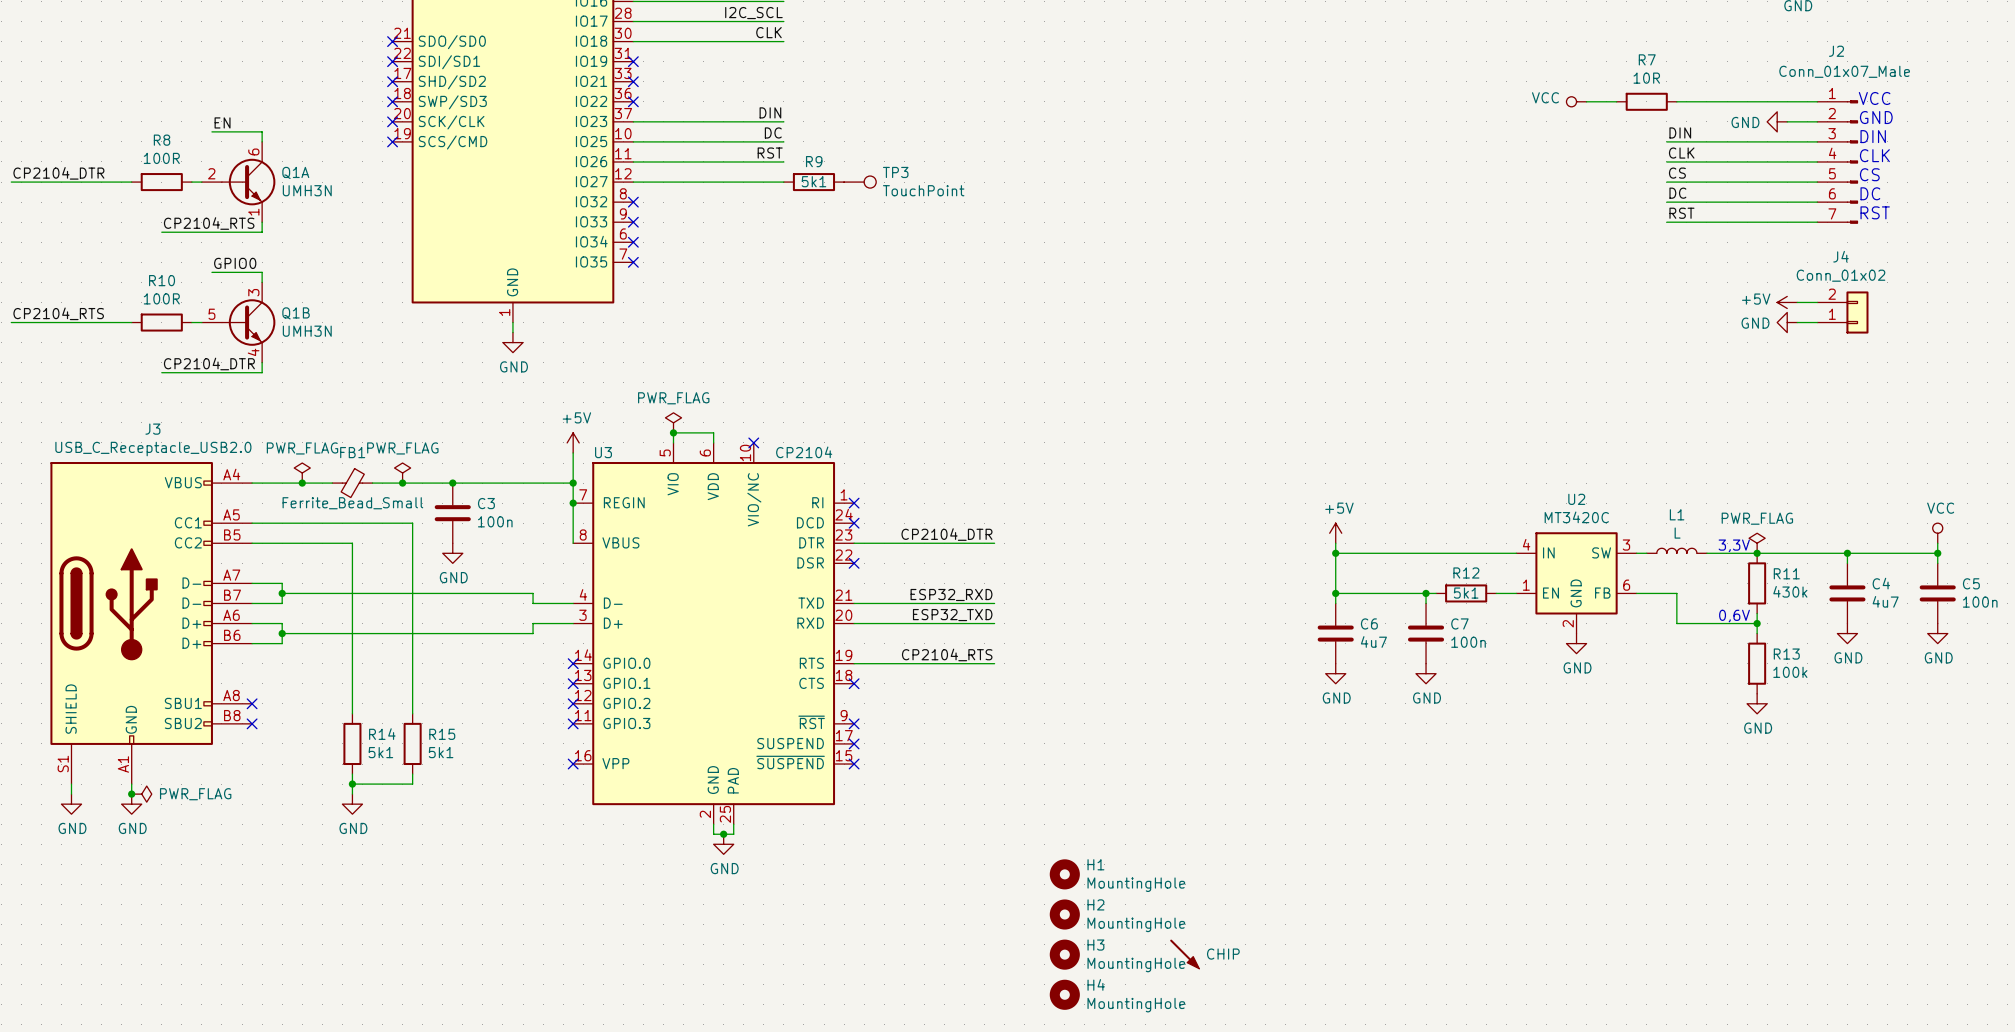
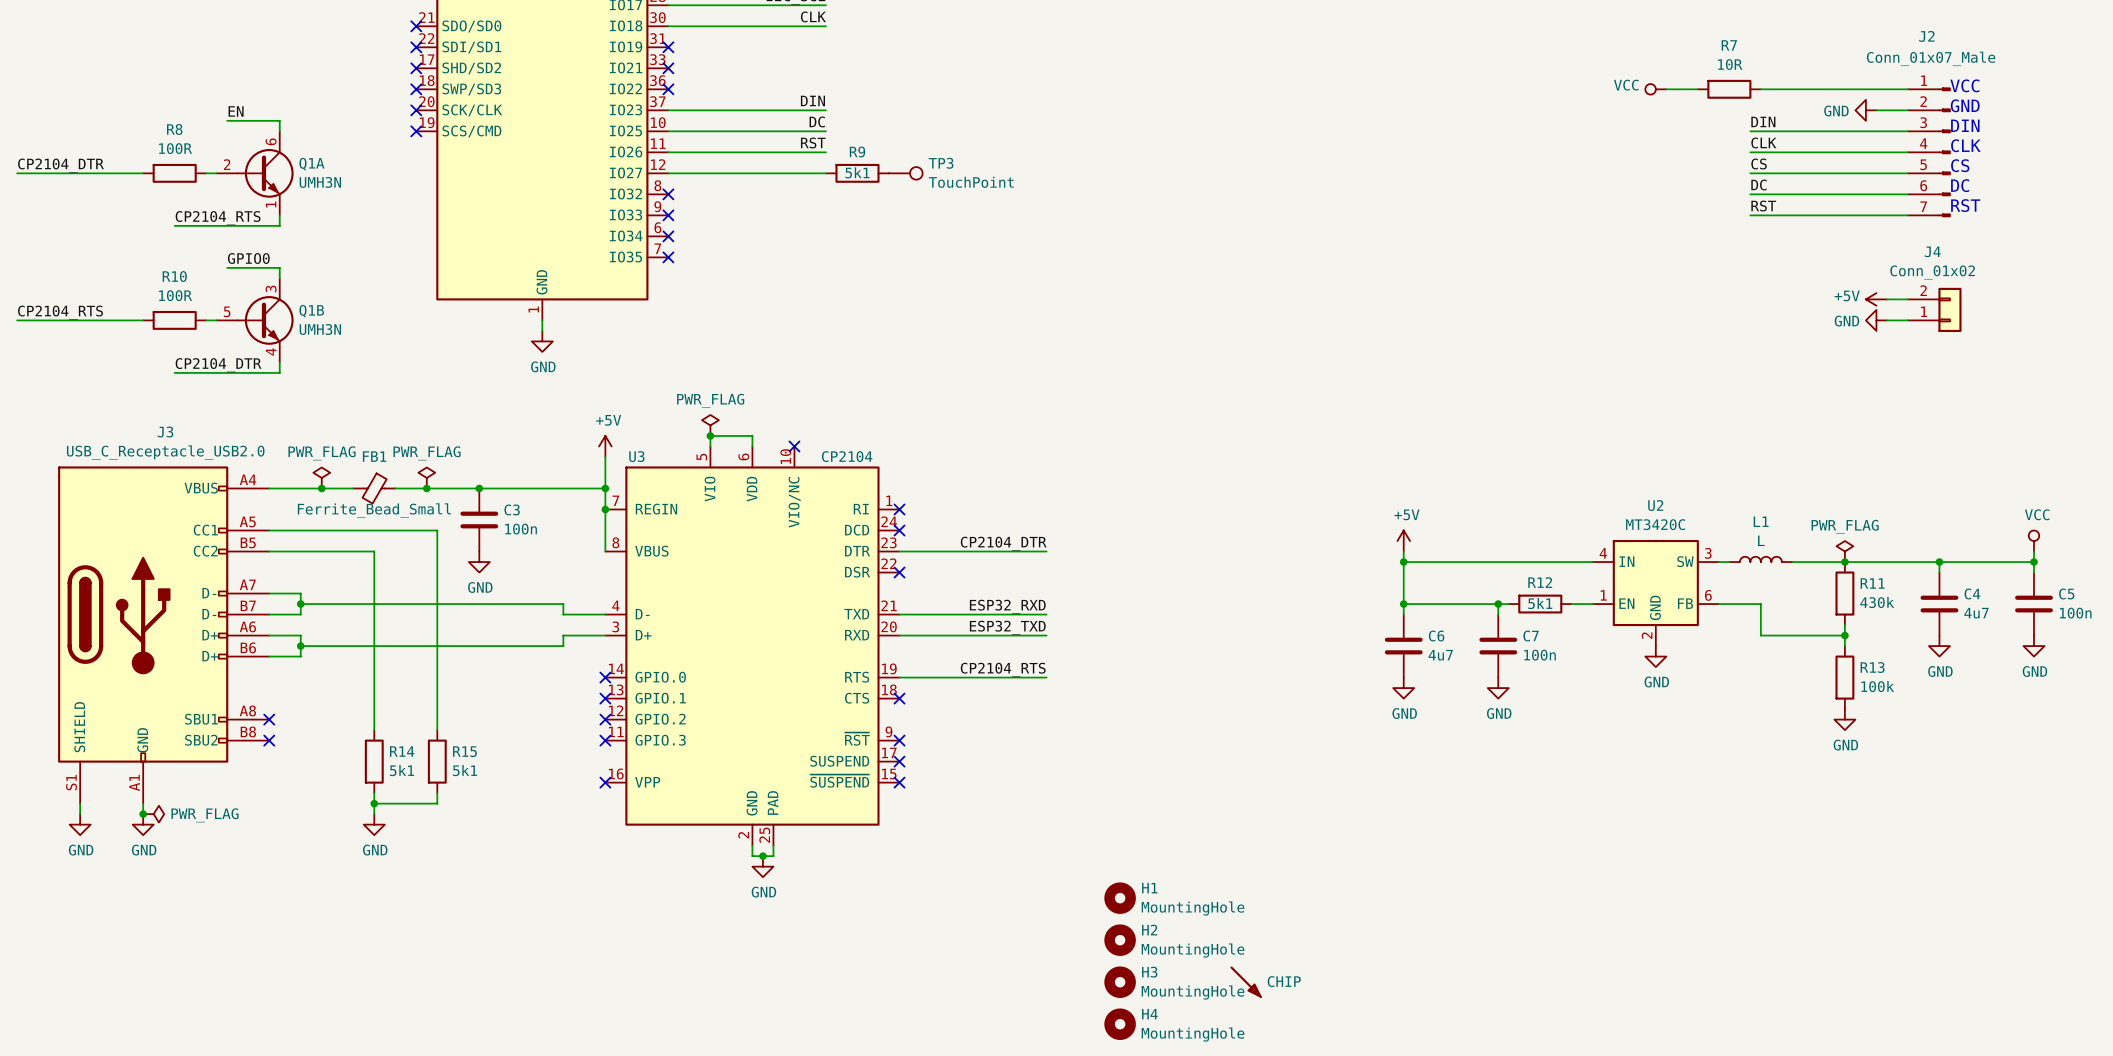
text: 3,3V (1734, 545) -> none
text: 0,6V (1734, 616) -> none

